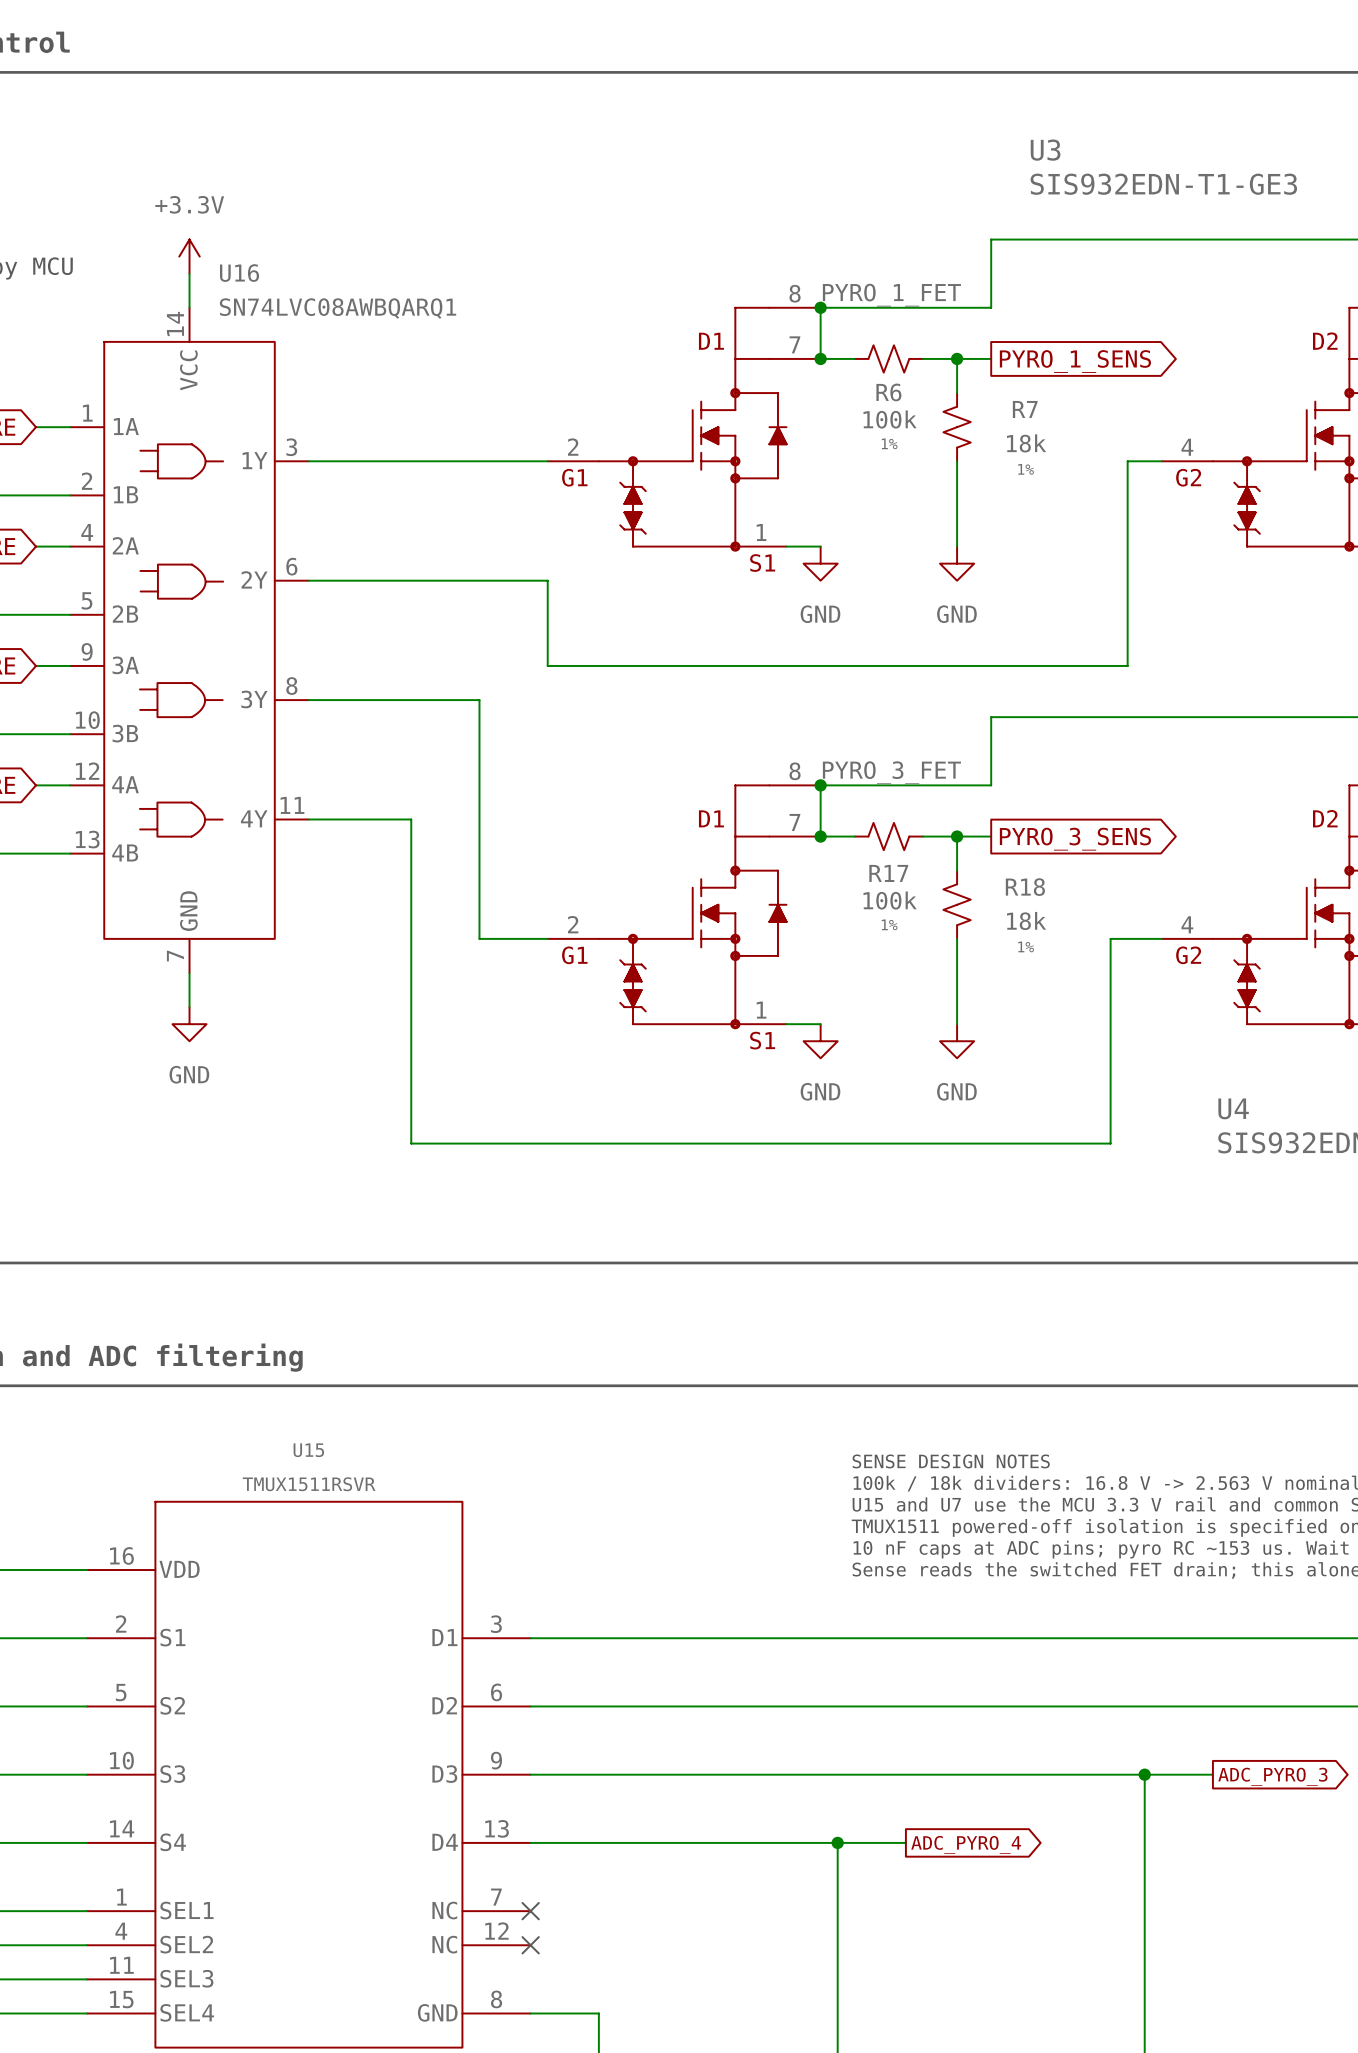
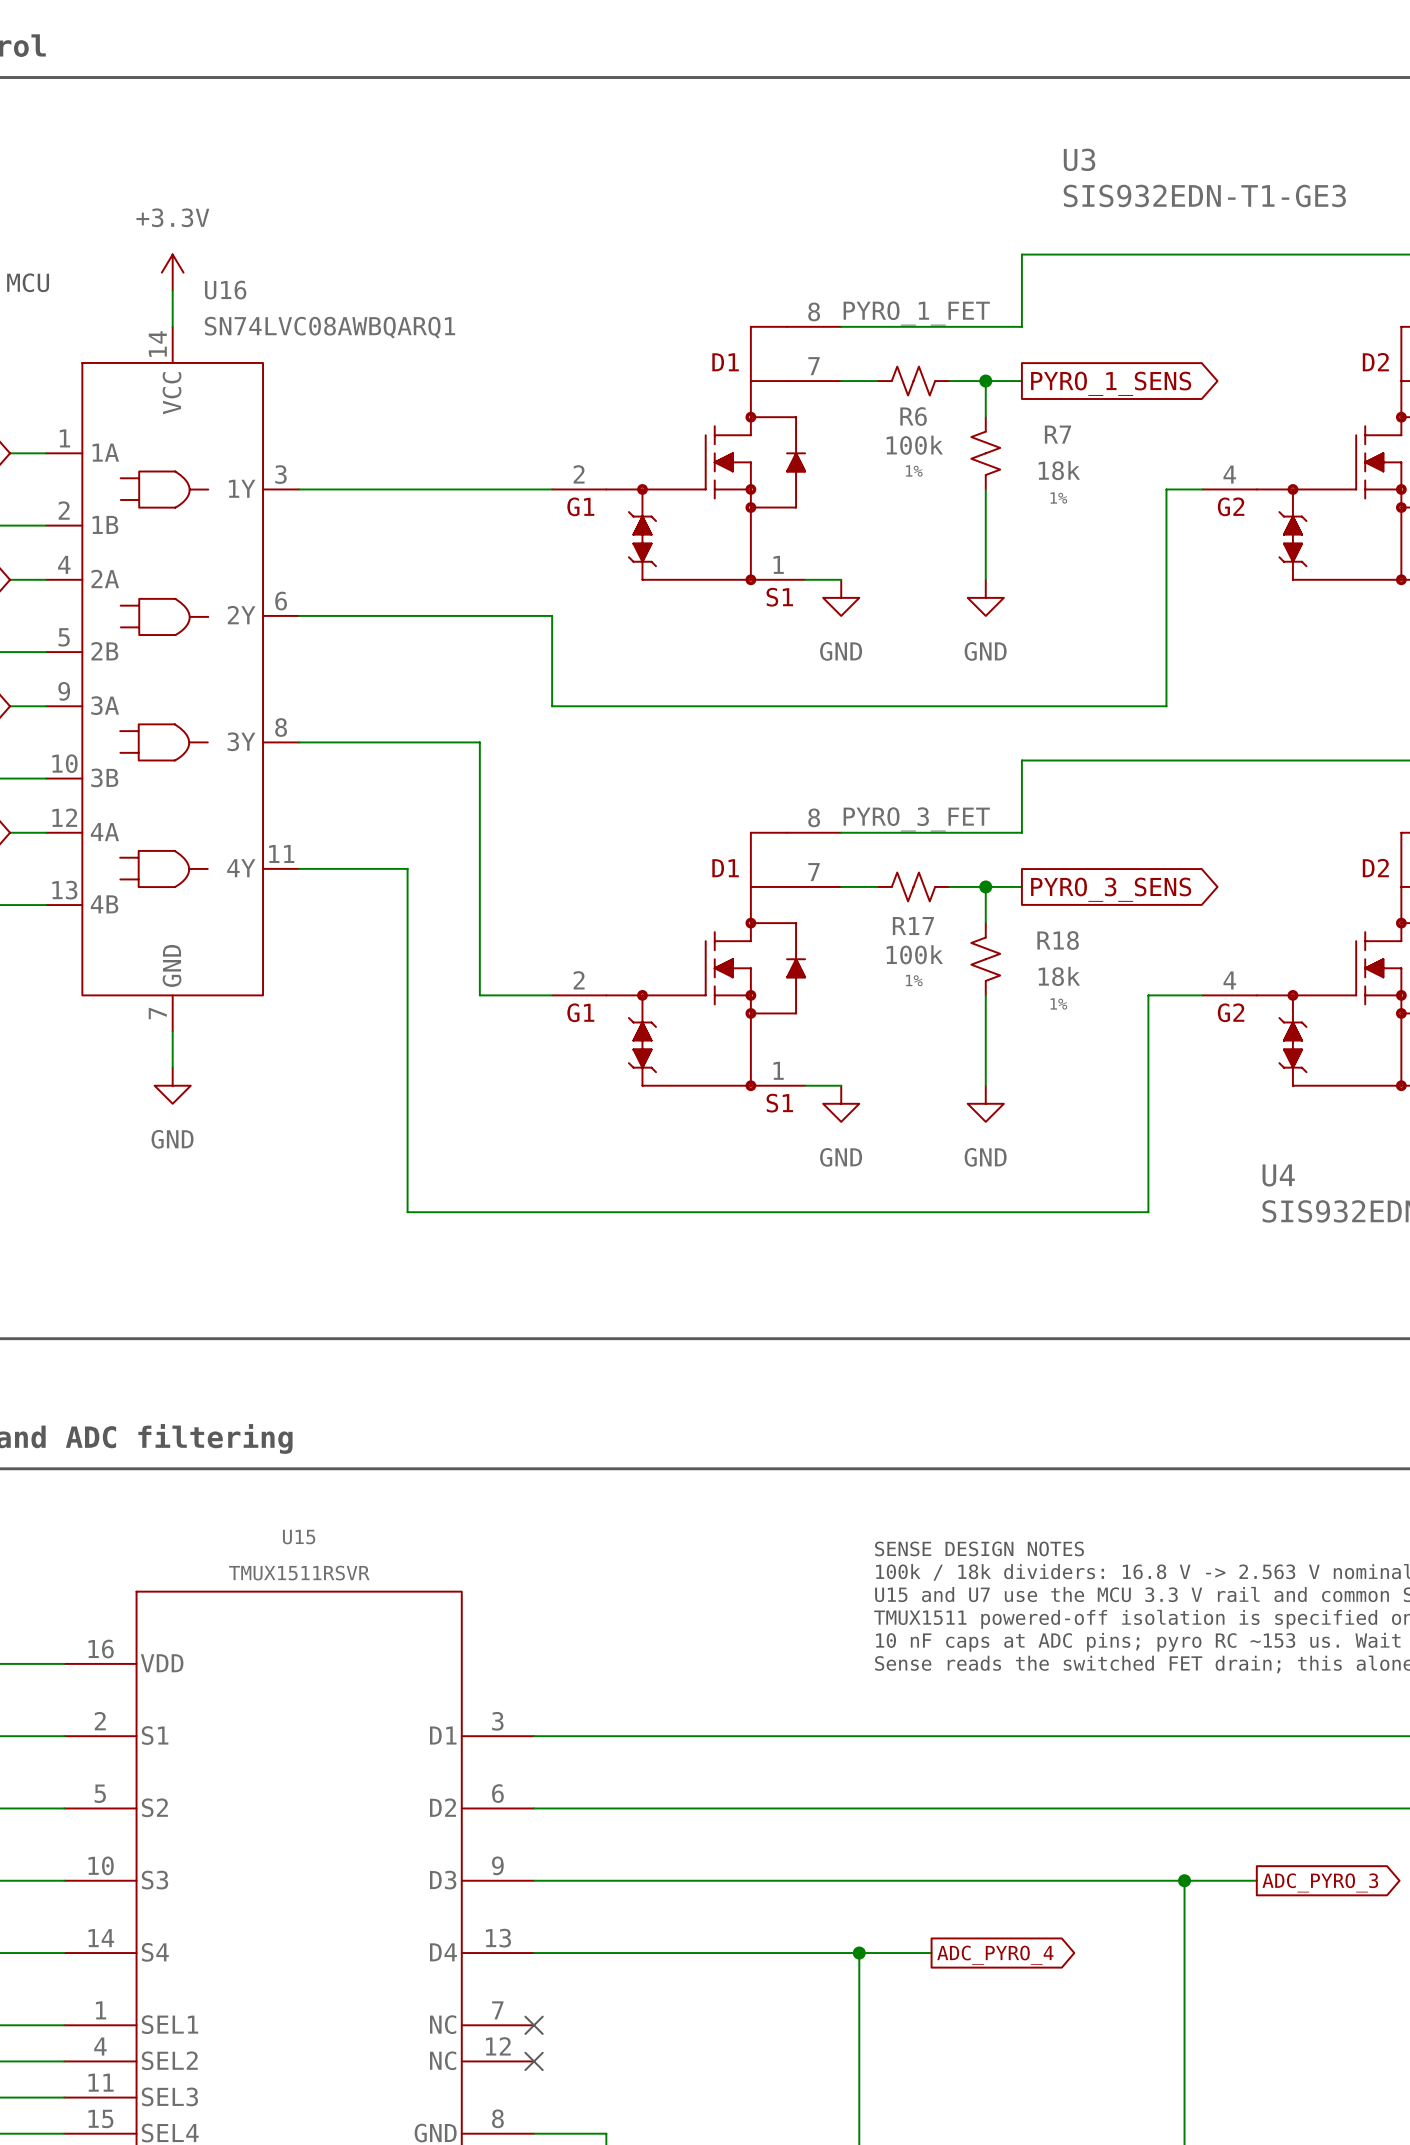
wire: (820, 307) (820, 358) -> none
junction: (820, 307) -> none
junction: (820, 358) -> none
wire: (820, 785) (820, 836) -> none
junction: (820, 785) -> none
junction: (820, 836) -> none

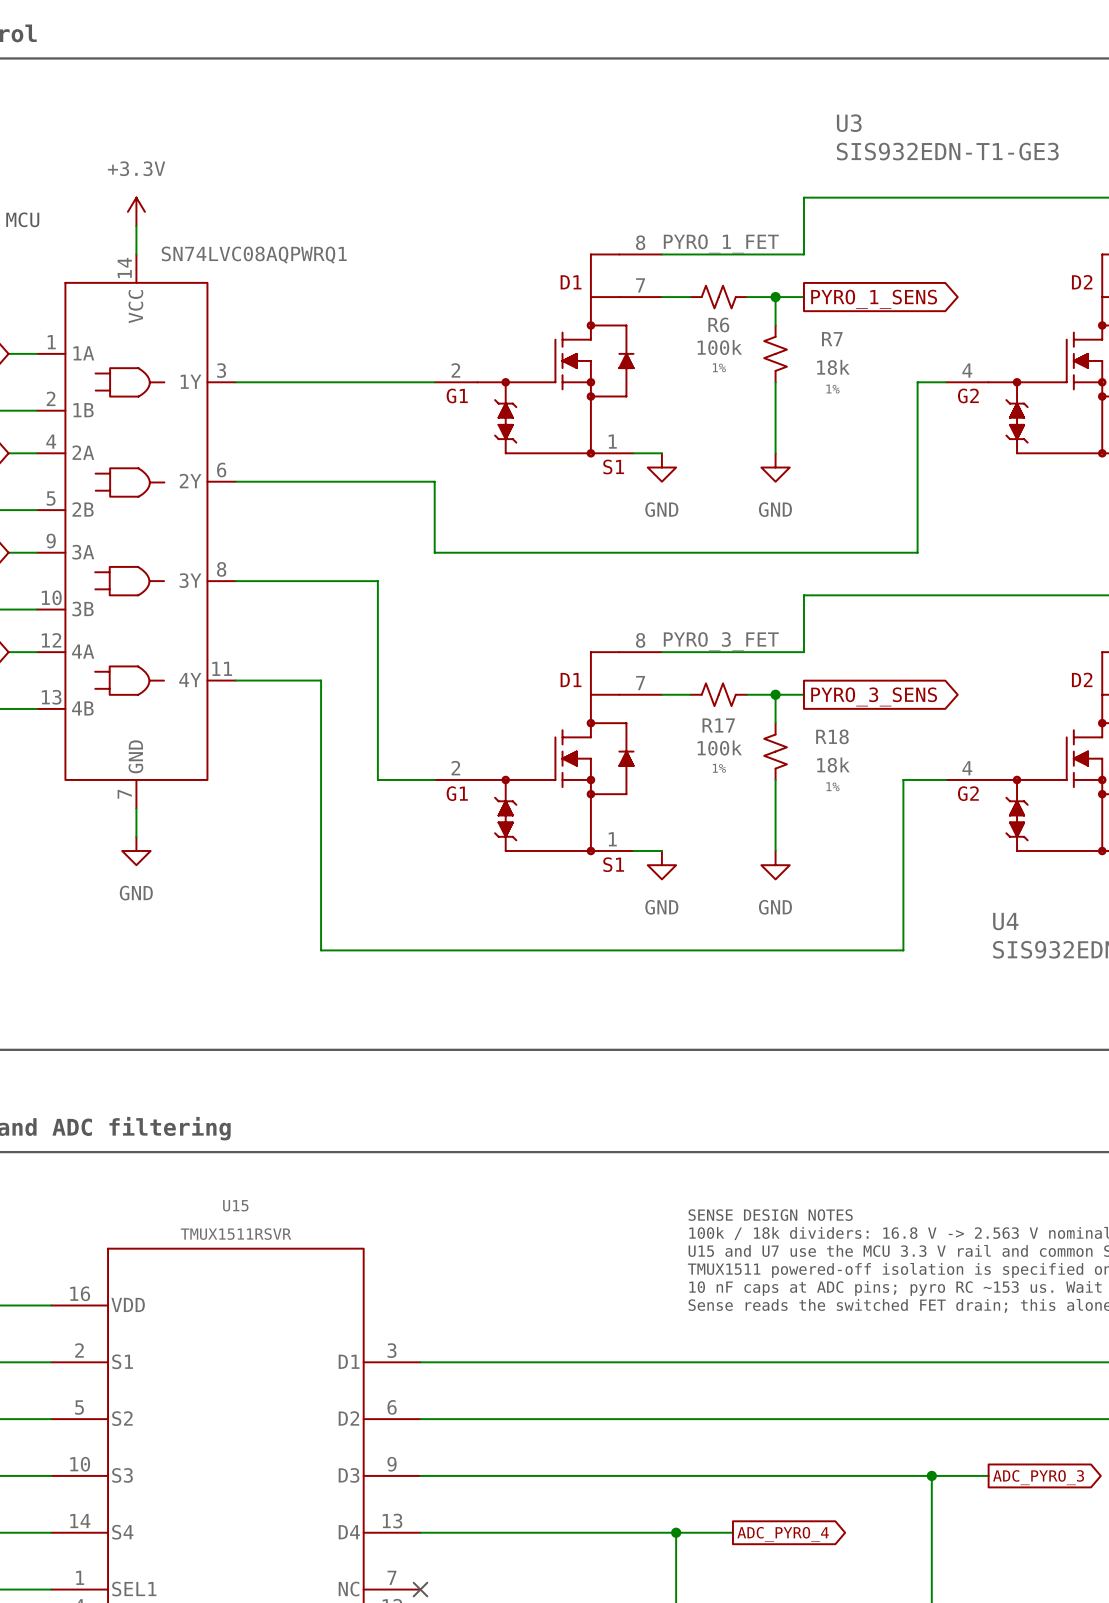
U16 name: U16 (225, 290) -> SN74LVC08AQPWRQ1 (254, 255)
U16 value: SN74LVC08AWBQARQ1 (330, 327) -> none

